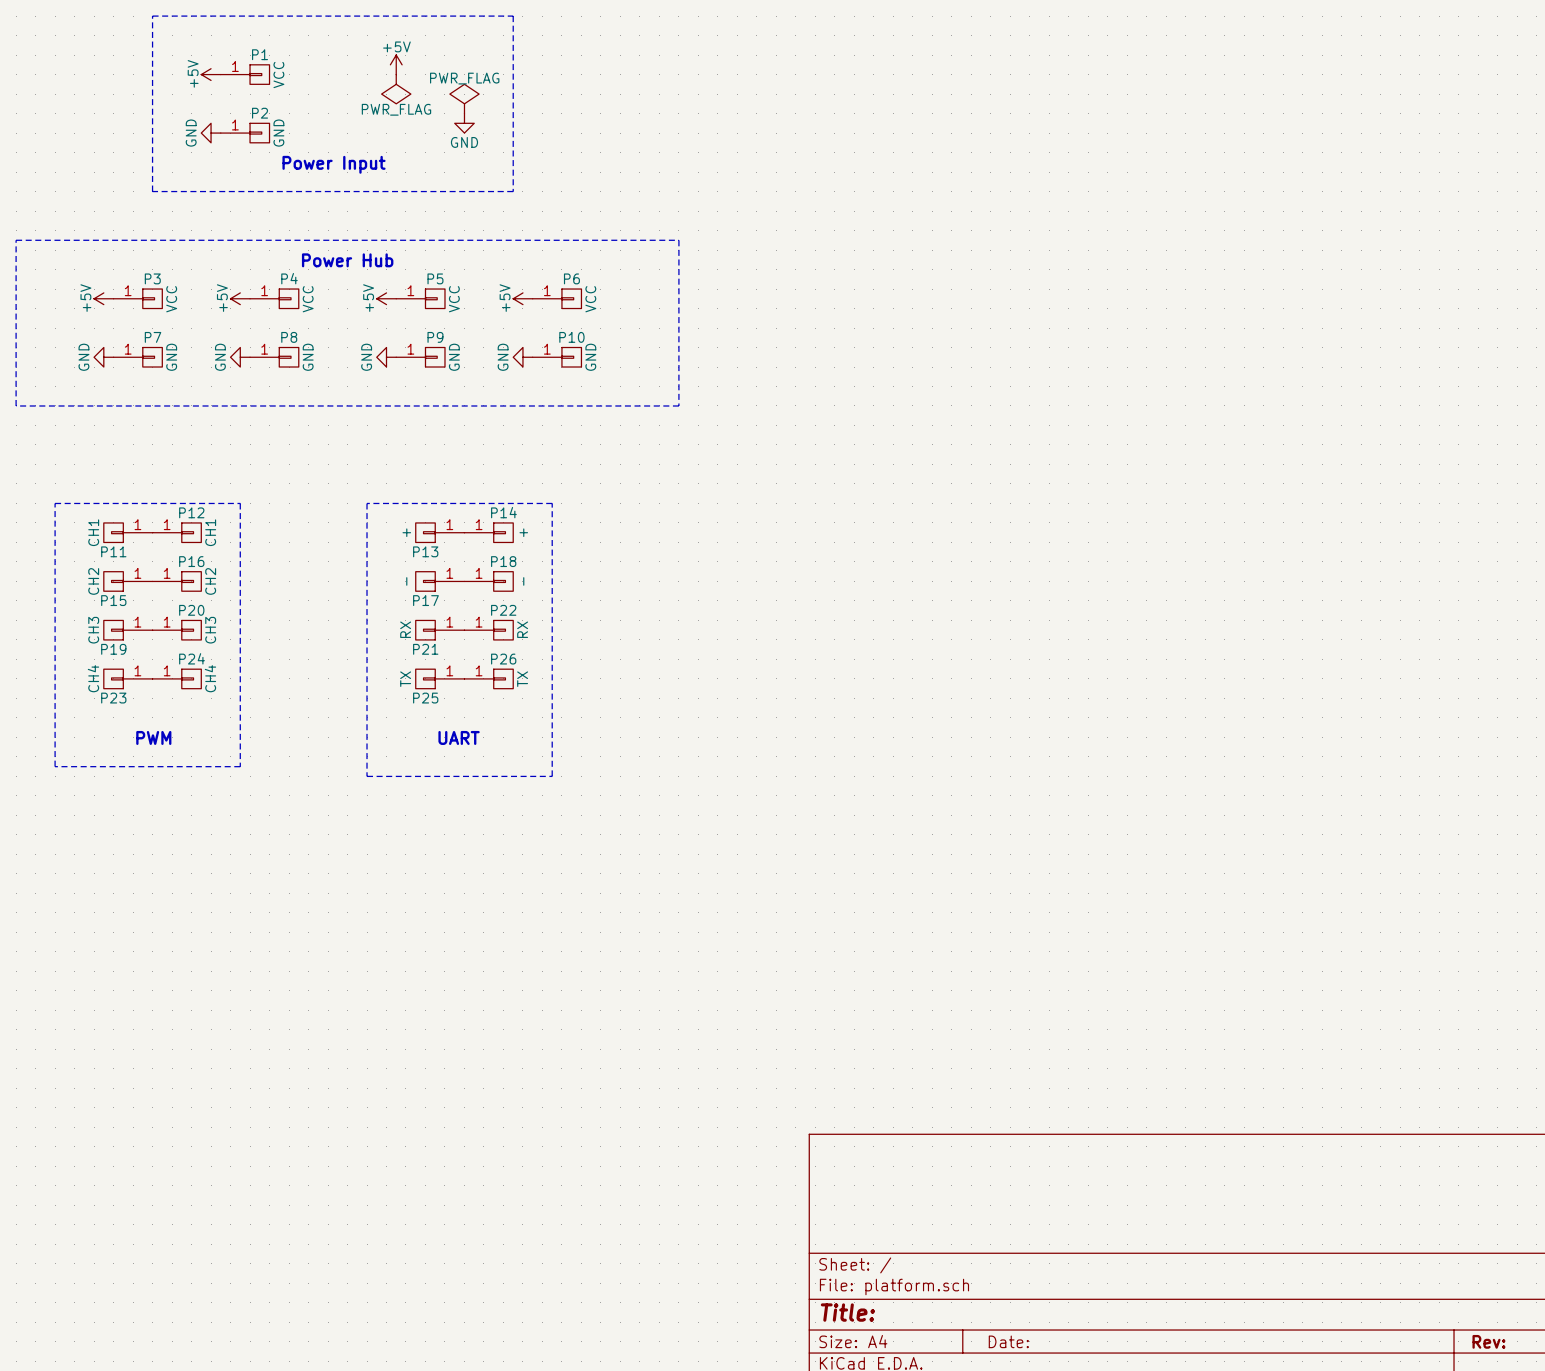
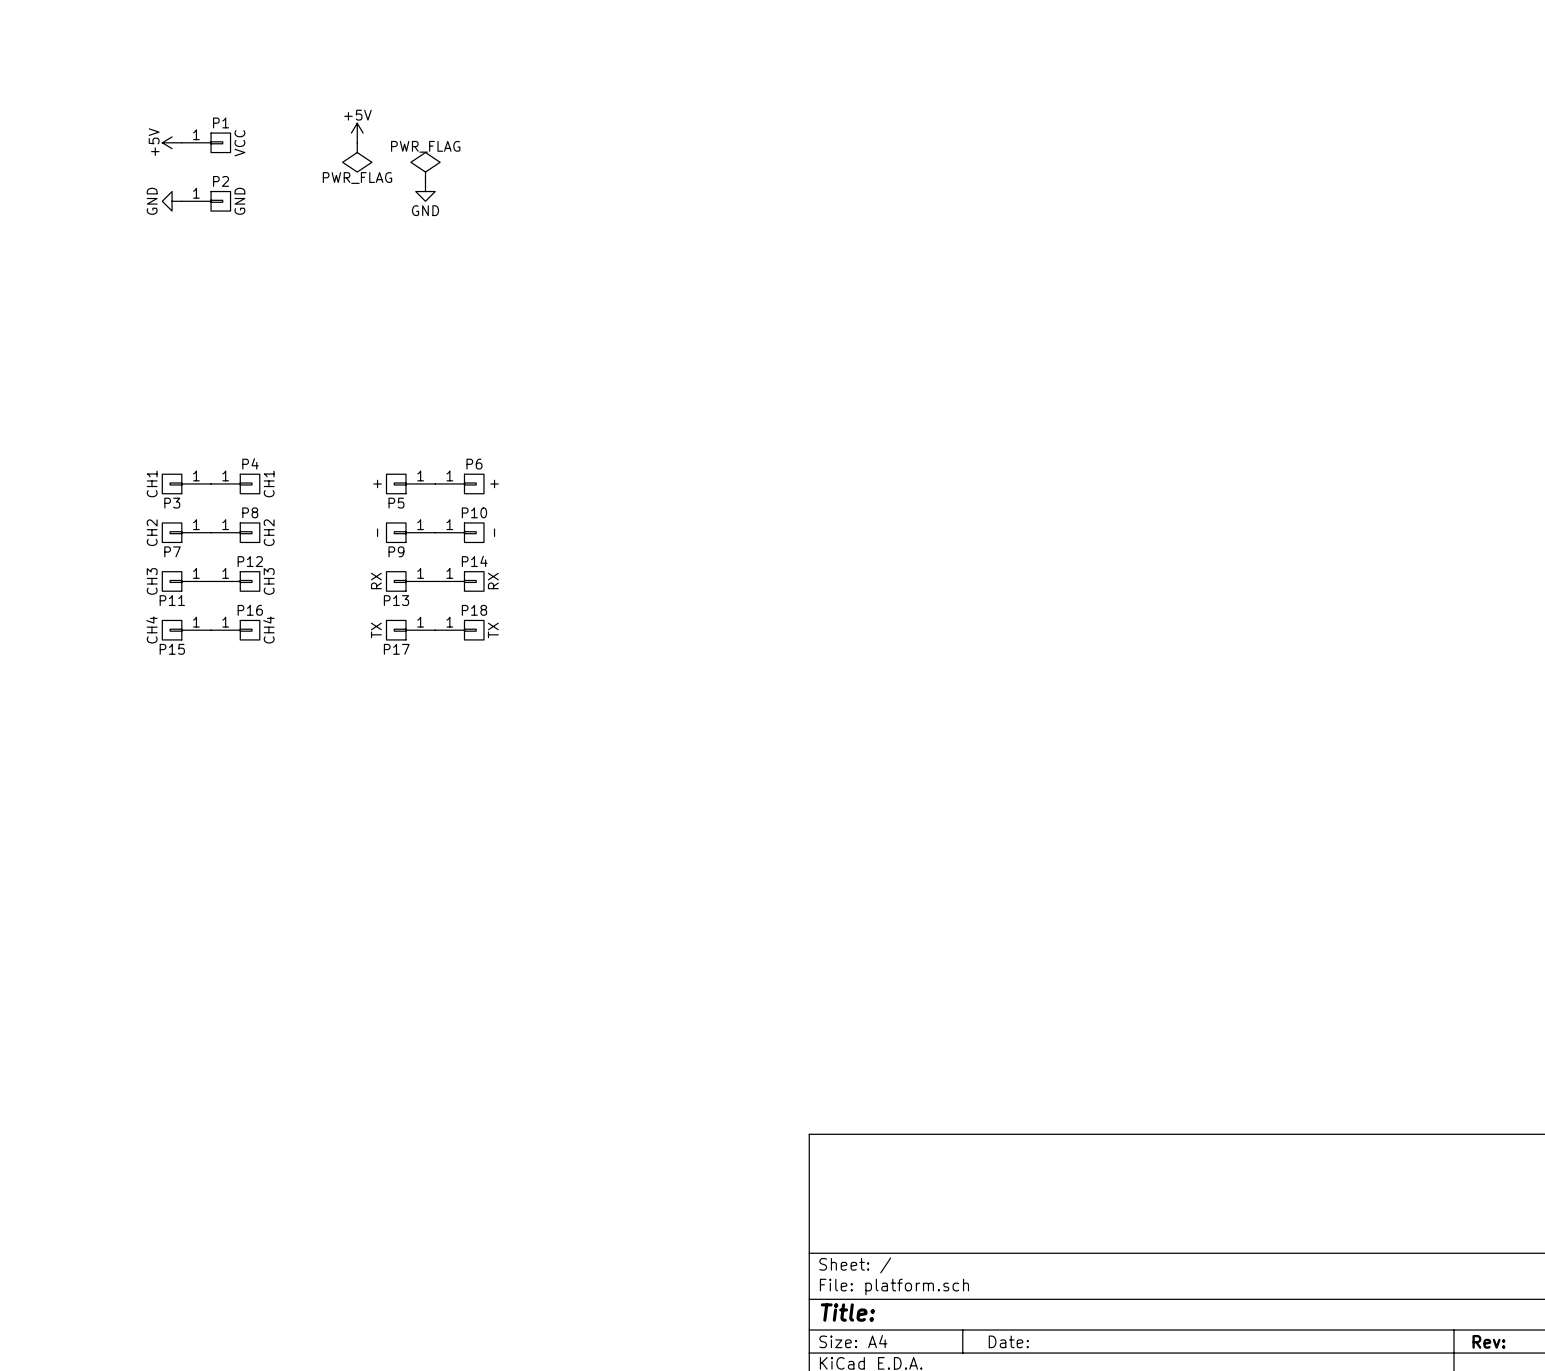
line: (152, 16) (513, 16) (513, 191) (152, 191) (152, 16) -> none
power symbol position: +5V (396, 64) -> +5V (357, 133)
power symbol position: +5V (211, 74) -> +5V (172, 142)
P1 position: (245, 74) -> (206, 142)
power symbol: PWR_FLAG (396, 89) -> none
power symbol: PWR_FLAG (464, 98) -> none
power symbol position: GND (464, 123) -> GND (425, 191)
power symbol position: GND (211, 133) -> GND (172, 201)
P2 position: (245, 133) -> (206, 201)
power symbol: none -> PWR_FLAG (357, 157)
text: Power Input (334, 164) -> none
power symbol: none -> PWR_FLAG (425, 167)
line: (16, 240) (678, 240) (678, 405) (16, 405) (16, 240) -> none
text: Power Hub (347, 260) -> none
power symbol: +5V (103, 298) -> none
P3 position: (137, 298) -> (186, 483)
P3 rotation: 0° (152, 298) -> 180° (172, 483)
power symbol: +5V (240, 298) -> none
P4 position: (274, 298) -> (235, 483)
power symbol: +5V (386, 298) -> none
P5 position: (420, 298) -> (410, 483)
P5 rotation: 0° (435, 298) -> 180° (396, 483)
power symbol: +5V (522, 298) -> none
P6 position: (557, 298) -> (459, 483)
P3 value: VCC (171, 299) -> CH1 (152, 483)
P4 value: VCC (308, 299) -> CH1 (269, 483)
P5 value: VCC (454, 299) -> + (377, 483)
P6 value: VCC (590, 299) -> + (494, 483)
power symbol: GND (103, 357) -> none
P7 position: (137, 357) -> (186, 532)
P7 rotation: 0° (152, 357) -> 180° (172, 532)
P7 value: GND (171, 357) -> CH2 (152, 532)
power symbol: GND (240, 357) -> none
P8 position: (274, 357) -> (235, 532)
P8 value: GND (308, 357) -> CH2 (269, 532)
power symbol: GND (386, 357) -> none
P9 position: (420, 357) -> (410, 532)
P9 rotation: 0° (435, 357) -> 180° (396, 532)
P9 value: GND (454, 357) -> - (377, 532)
power symbol: GND (522, 357) -> none
P10 position: (557, 357) -> (459, 532)
P10 value: GND (590, 357) -> - (494, 532)
line: (55, 503) (240, 503) (240, 766) (55, 766) (55, 503) -> none
line: (367, 503) (367, 776) (552, 776) (552, 503) (367, 503) -> none
P11 value: CH1 (93, 532) -> CH3 (152, 581)
P11 position: (128, 532) -> (186, 581)
P12 position: (176, 532) -> (235, 581)
P12 value: CH1 (210, 532) -> CH3 (269, 581)
P13 value: + (406, 532) -> RX (376, 580)
P13 position: (440, 532) -> (410, 581)
P14 position: (488, 532) -> (459, 581)
P14 value: + (523, 532) -> RX (493, 580)
P15 value: CH2 (93, 581) -> CH4 (151, 629)
P15 position: (128, 581) -> (186, 630)
P16 position: (176, 581) -> (235, 630)
P16 value: CH2 (210, 581) -> CH4 (268, 629)
P17 value: - (406, 581) -> TX (376, 630)
P17 position: (440, 581) -> (410, 630)
P18 position: (488, 581) -> (459, 630)
P18 value: - (523, 581) -> TX (493, 630)
P19: CH3 (128, 630) -> none
P20: CH3 (176, 630) -> none
P21: RX (440, 630) -> none
P22: RX (488, 630) -> none
P23: CH4 (128, 678) -> none
P24: CH4 (176, 678) -> none
P25: TX (440, 678) -> none
P26: TX (488, 678) -> none
text: PWM (153, 737) -> none
text: UART (459, 737) -> none

